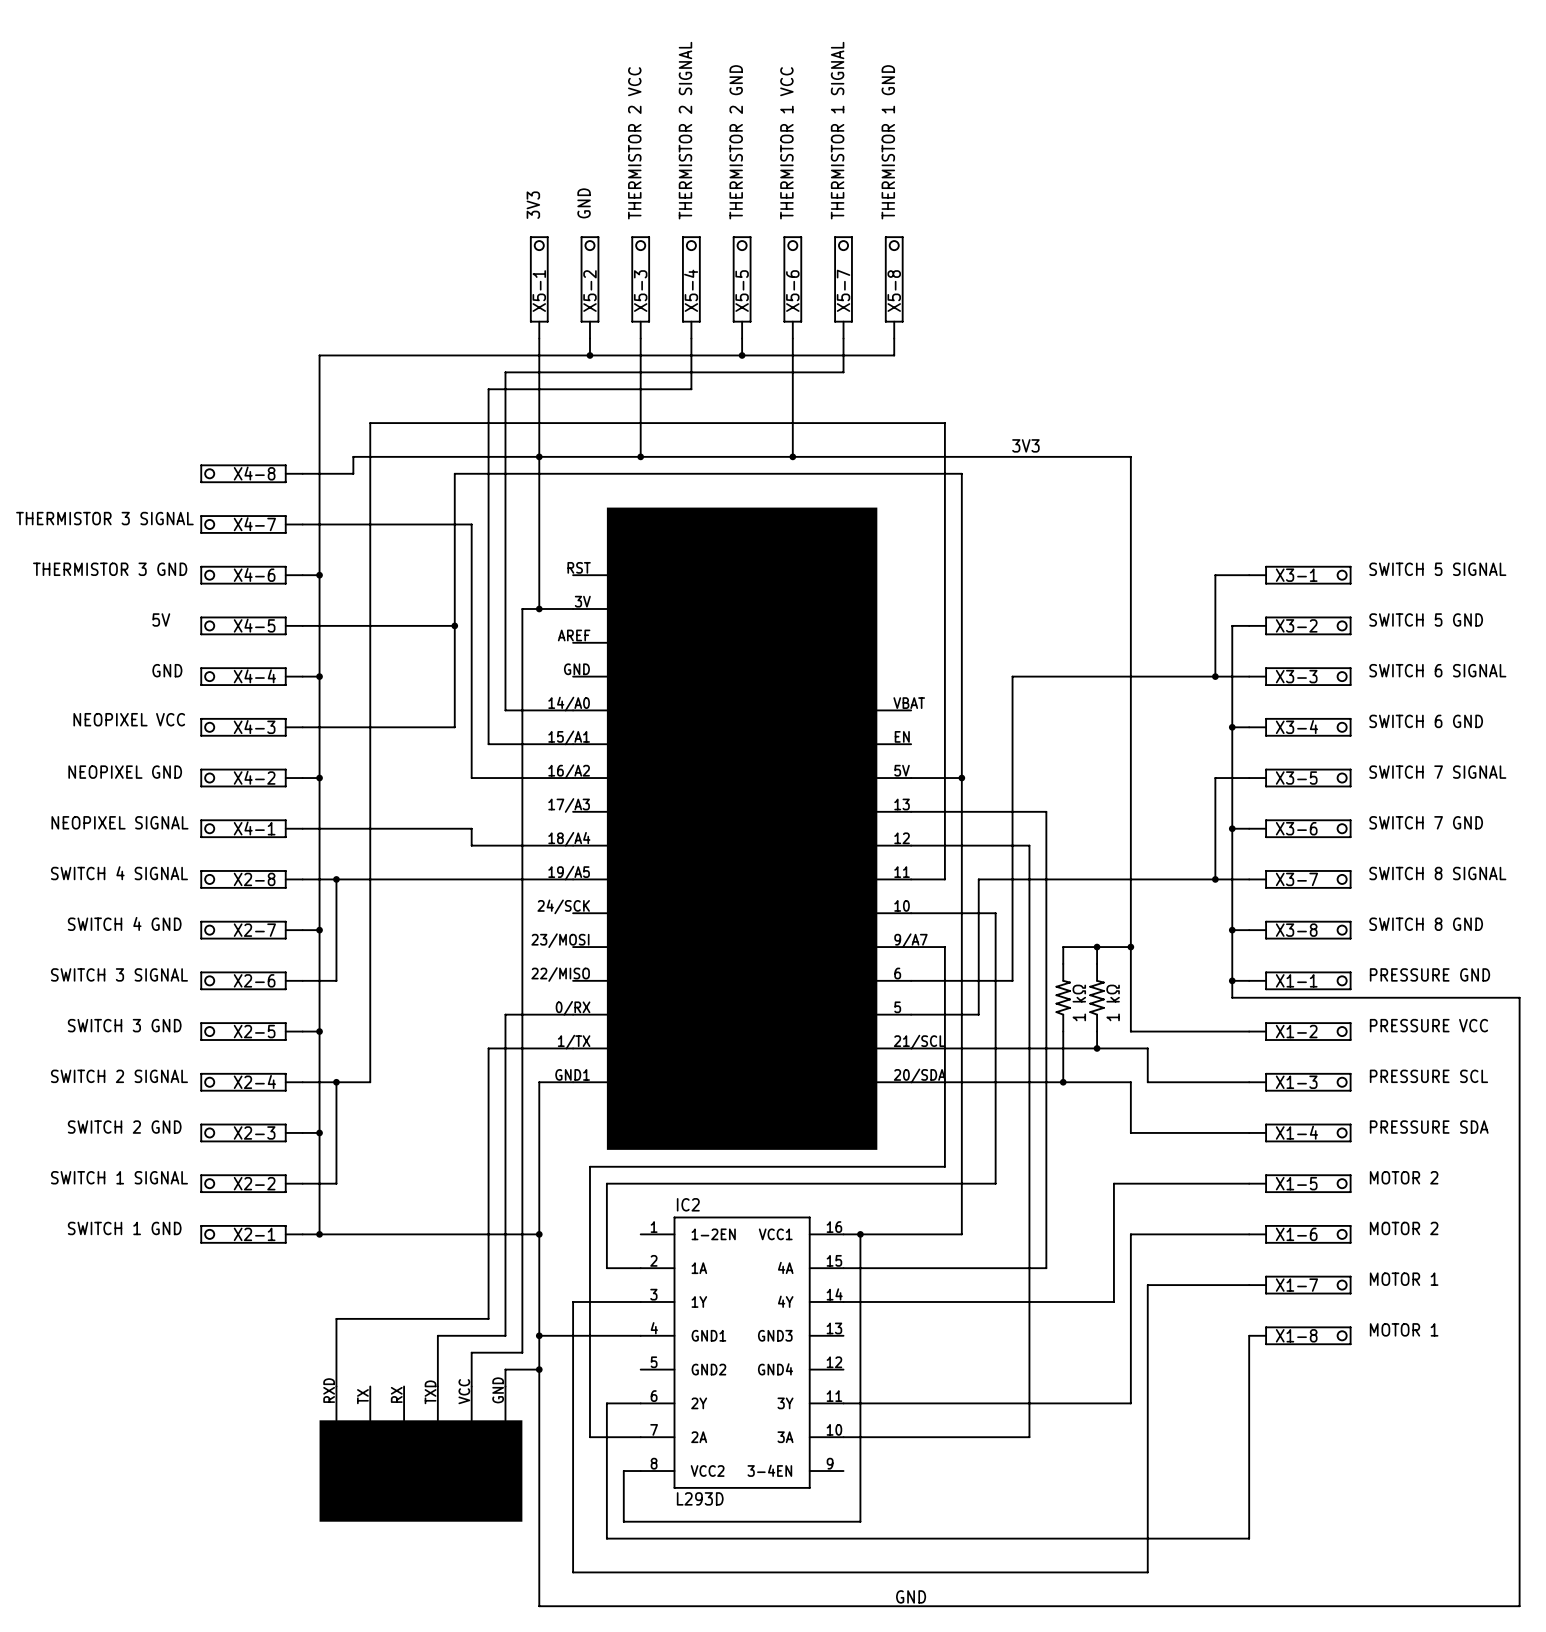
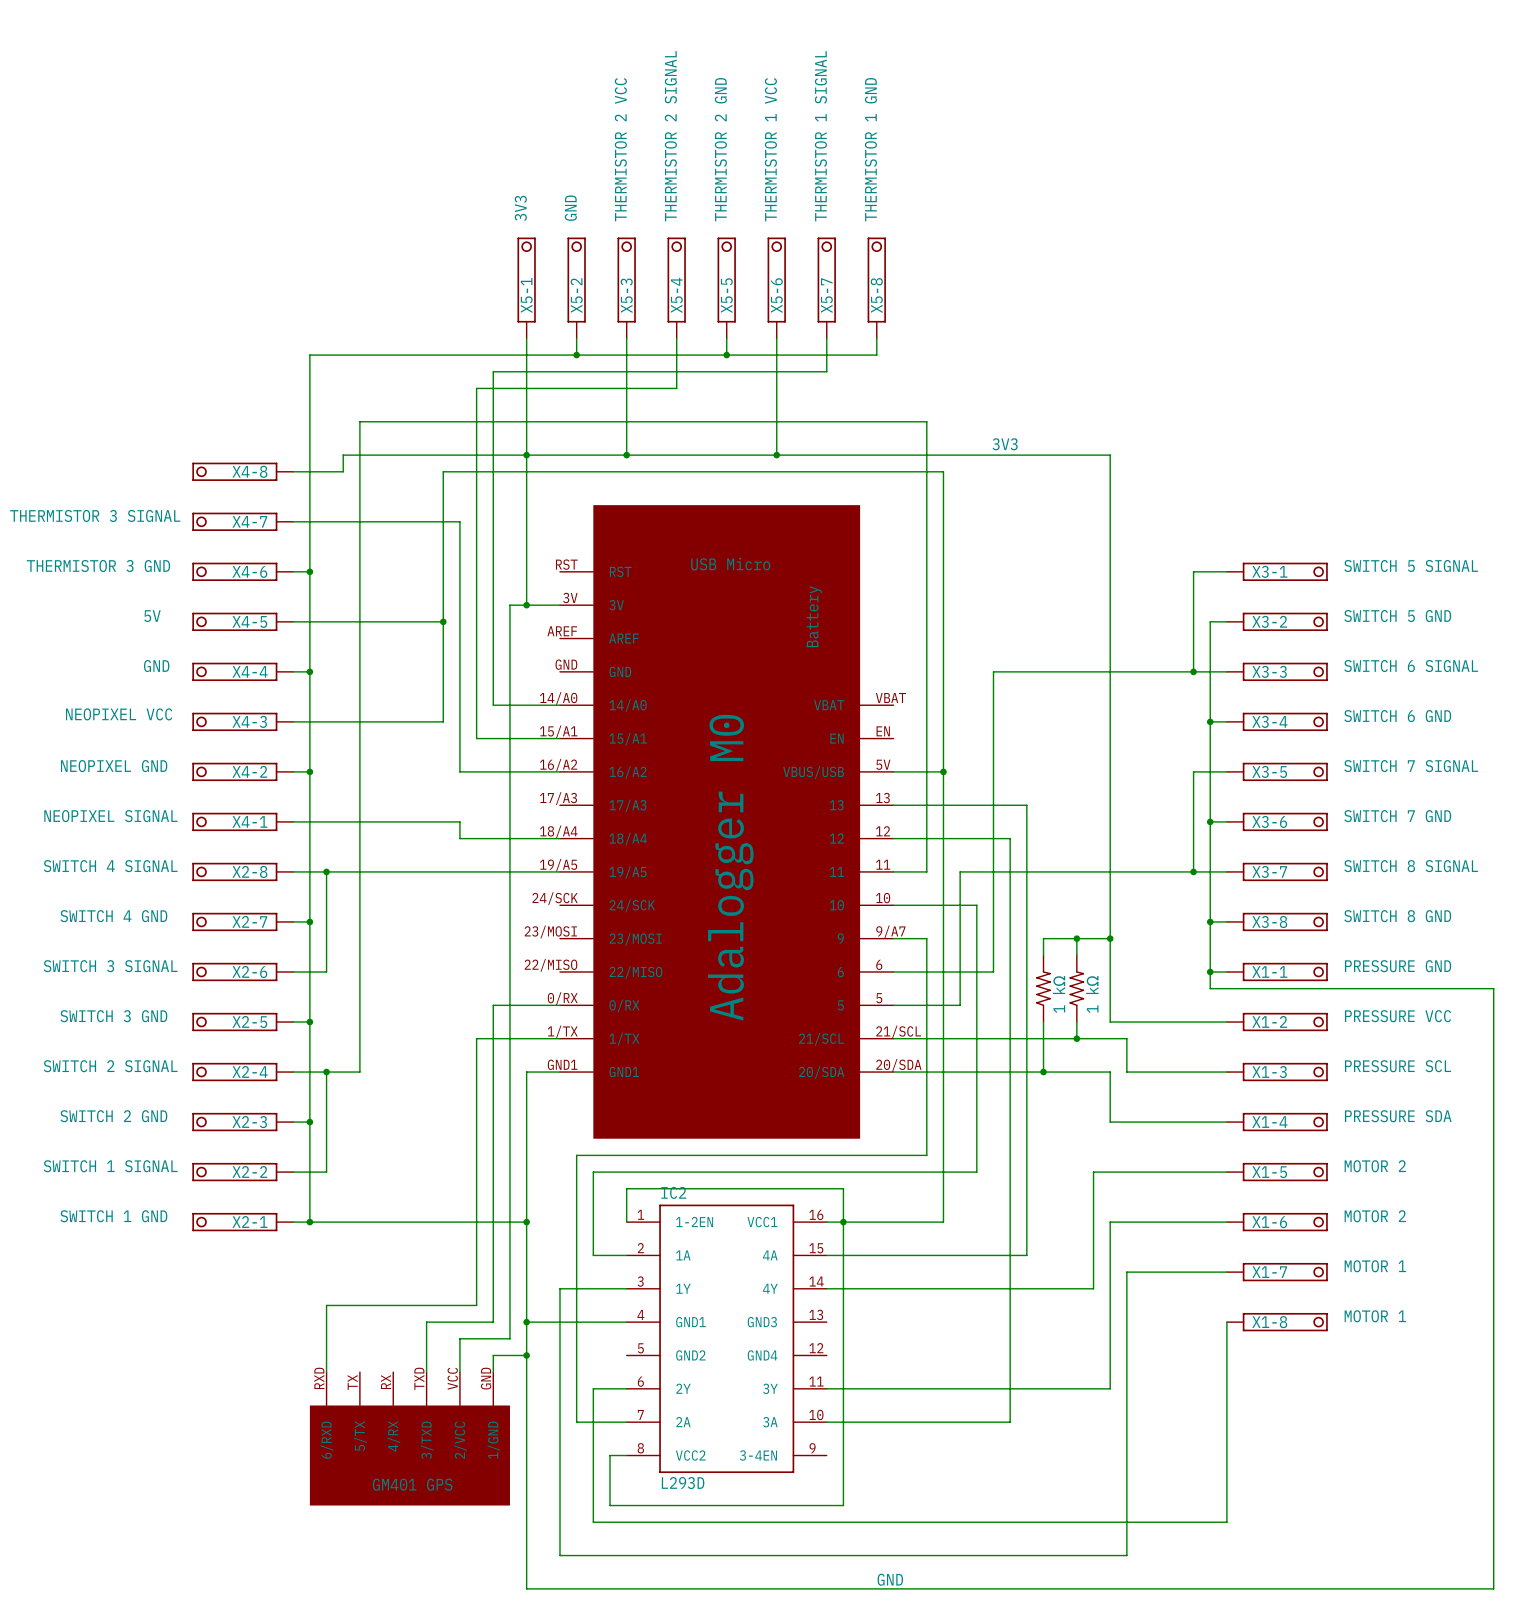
wire: none -> (626, 1222) (626, 1188) (843, 1188) (843, 1222)

